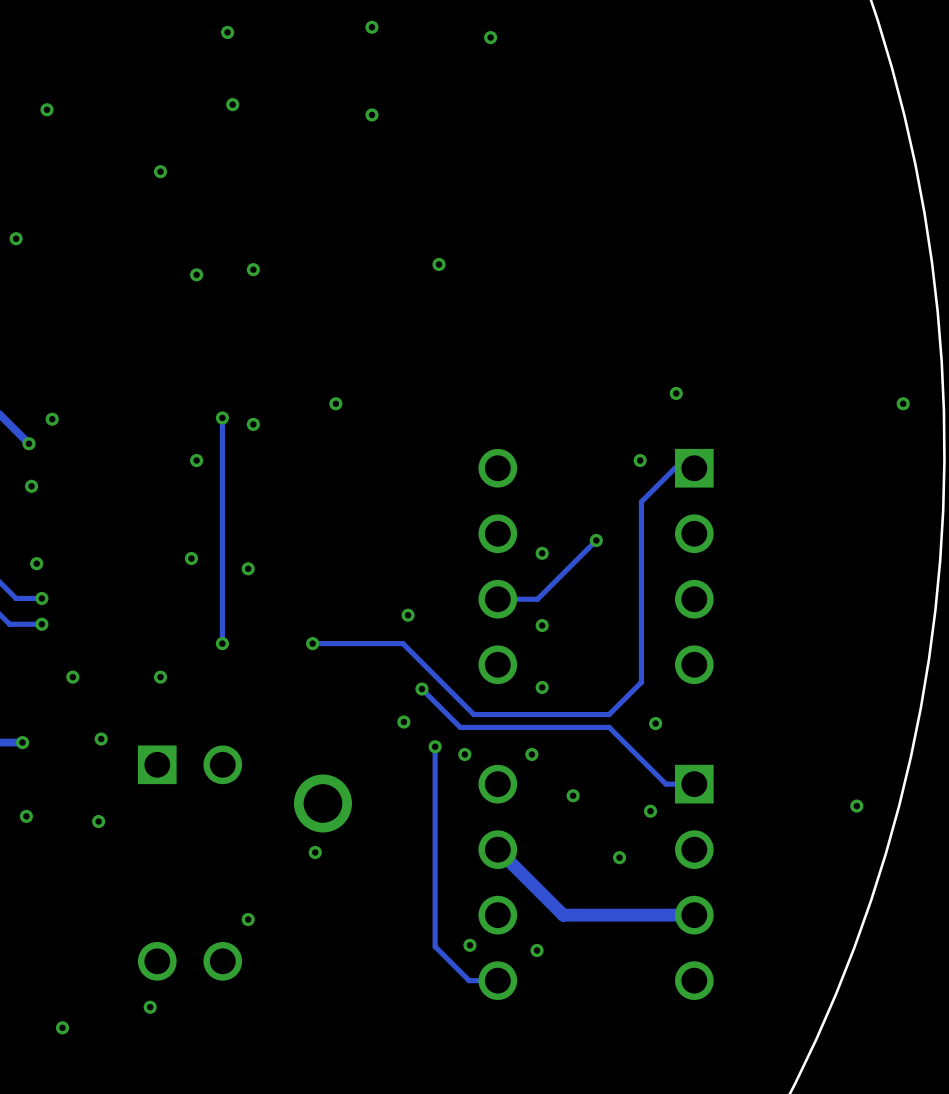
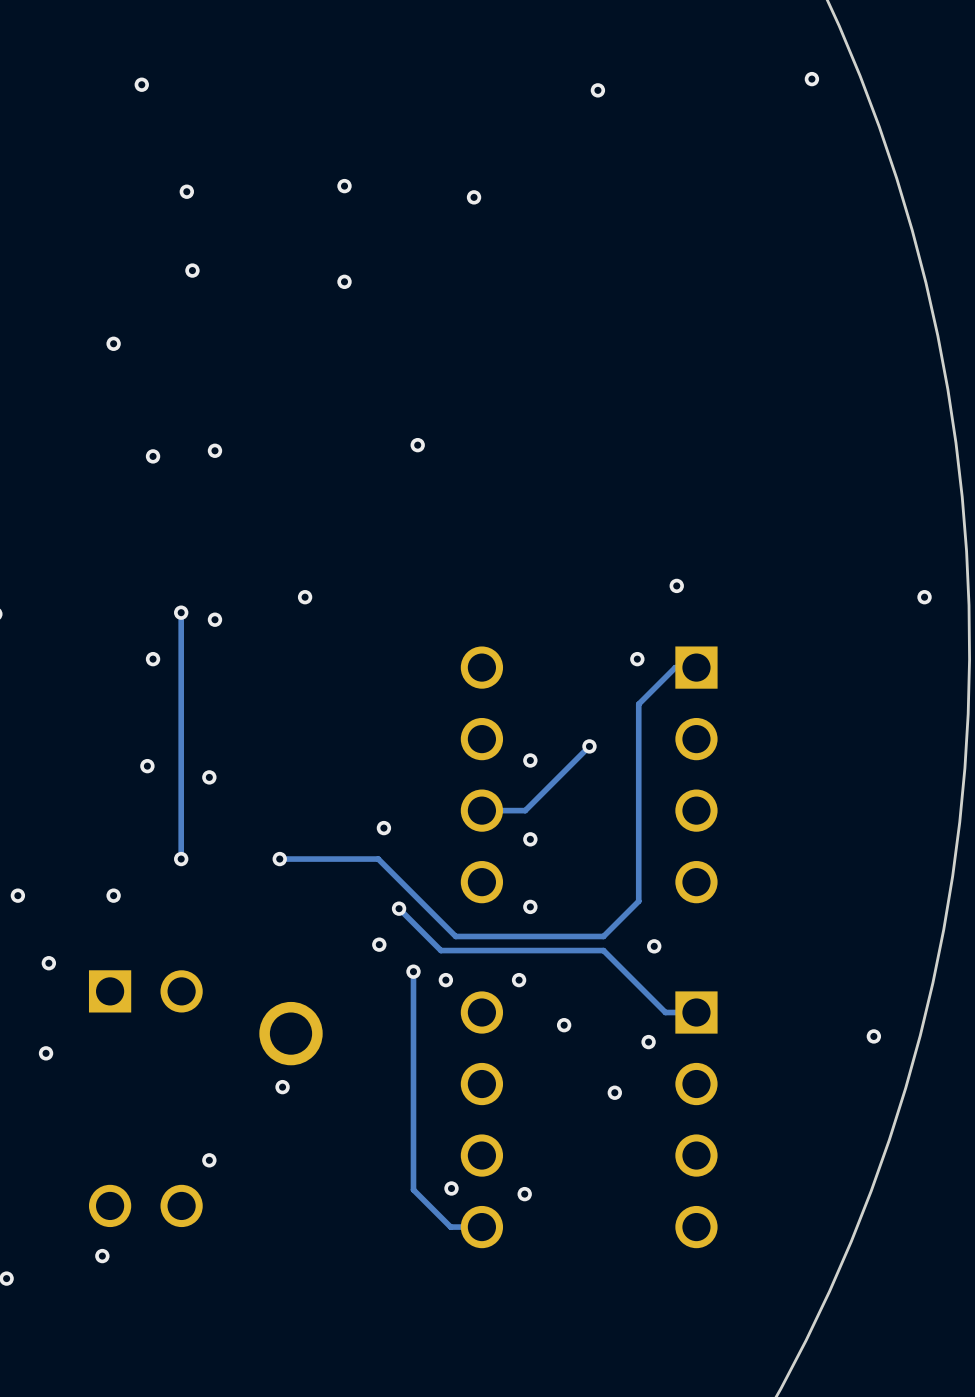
track: (497, 849) (563, 915) (694, 915) -> none

